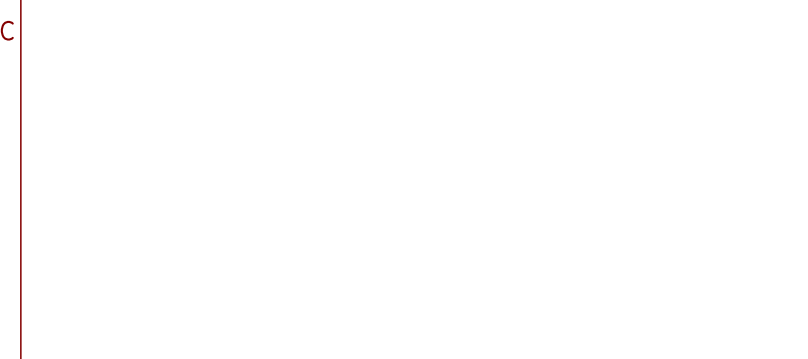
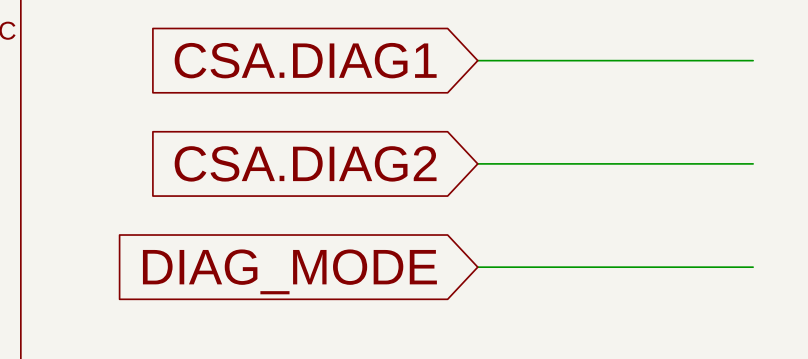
global label: none -> CSA.DIAG1 (305, 60)
wire: none -> (477, 60) (753, 60)
global label: none -> CSA.DIAG2 (305, 163)
wire: none -> (477, 163) (753, 163)
wire: none -> (477, 267) (753, 267)
global label: none -> DIAG_MODE (289, 271)

